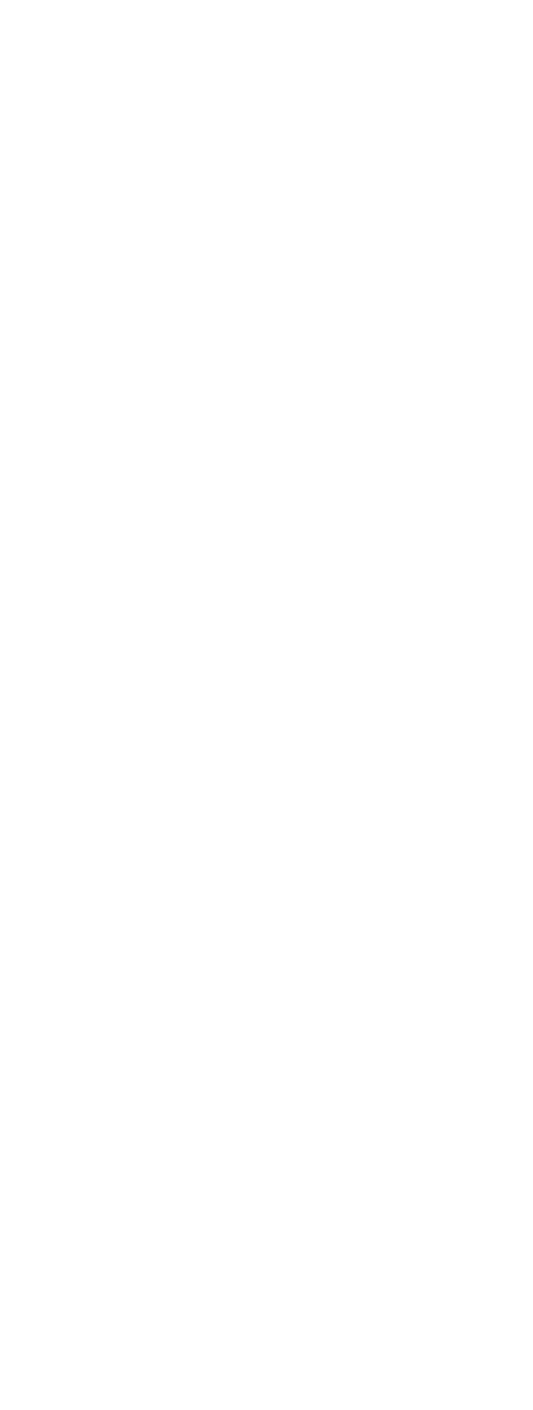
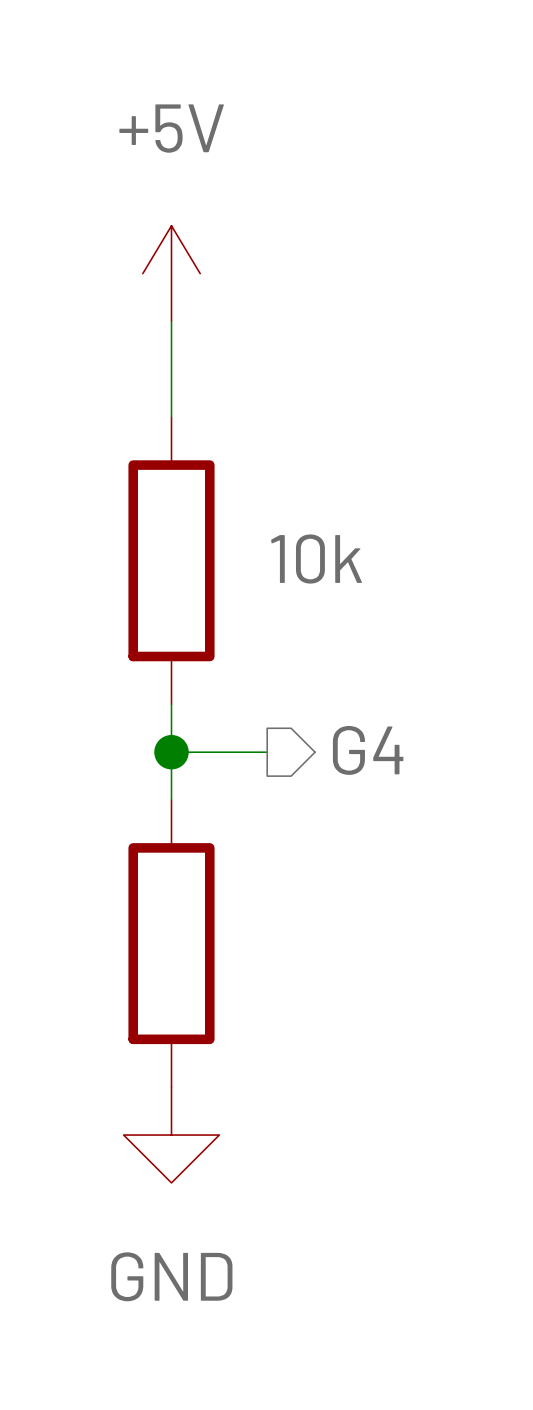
power symbol: none -> +5V (171, 273)
wire: none -> (171, 321) (171, 417)
part: none -> 10k (171, 560)
wire: none -> (171, 704) (171, 800)
hierarchical label: none -> G4 (368, 750)
wire: none -> (171, 752) (267, 752)
junction: none -> (171, 752)
part: none -> (171, 943)
power symbol: none -> GND (171, 1135)

